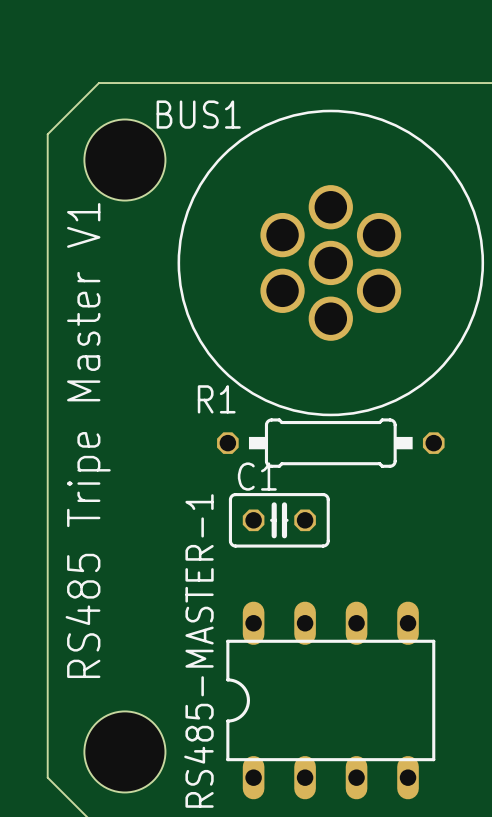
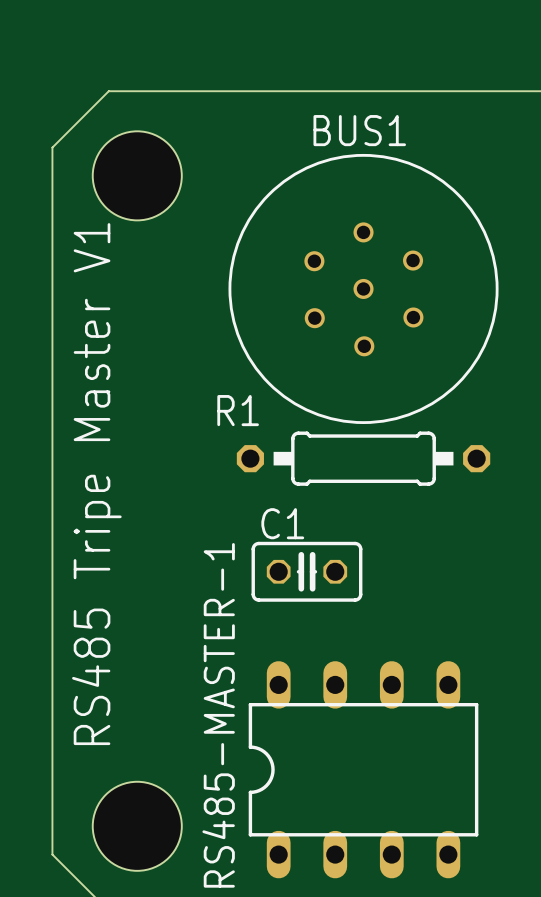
BUS1 footprint: [177, 109, 485, 417] -> [228, 153, 499, 424]
BUS1 name position: BUS1 (198, 114) -> BUS1 (359, 130)
R1 footprint: [217, 418, 445, 468] -> [236, 431, 491, 486]

